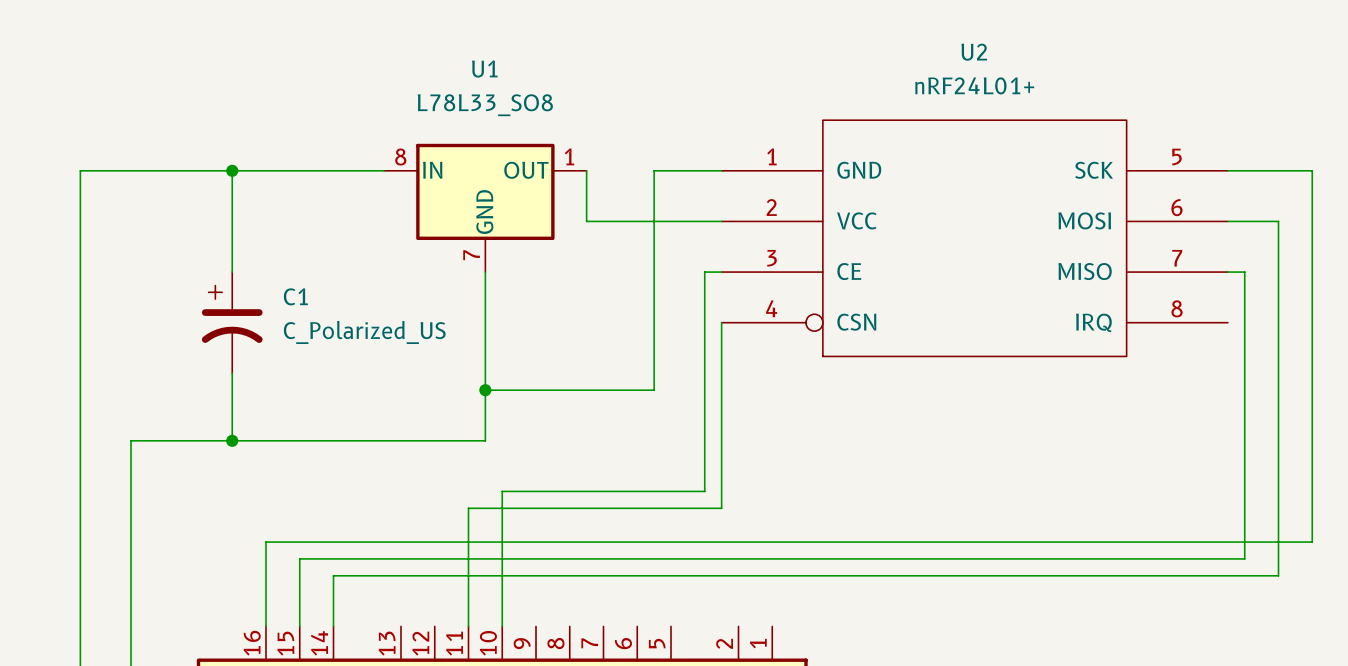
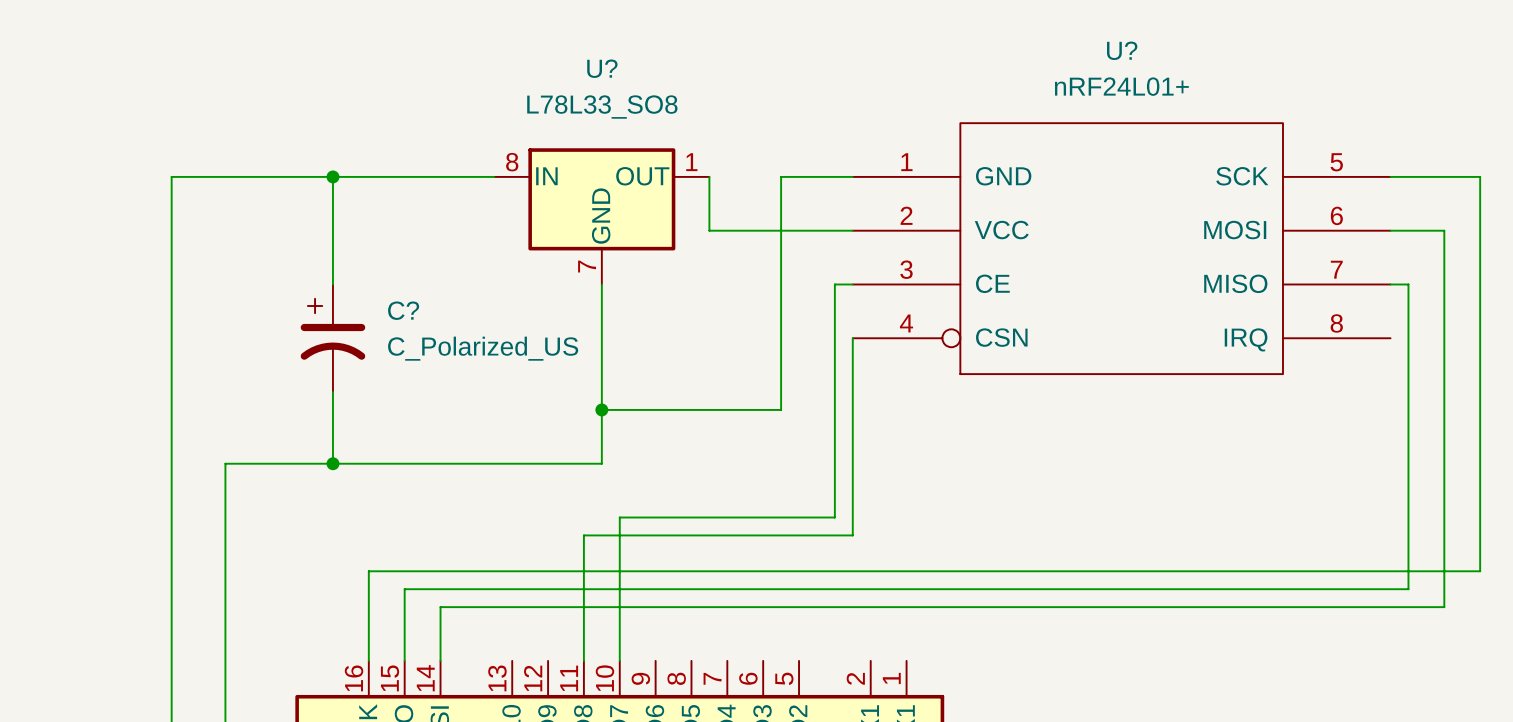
U2 name: U2 (974, 52) -> U? (1122, 50)
U1 name: U1 (484, 69) -> U? (602, 68)
C1 name: C1 (295, 296) -> C? (403, 310)

